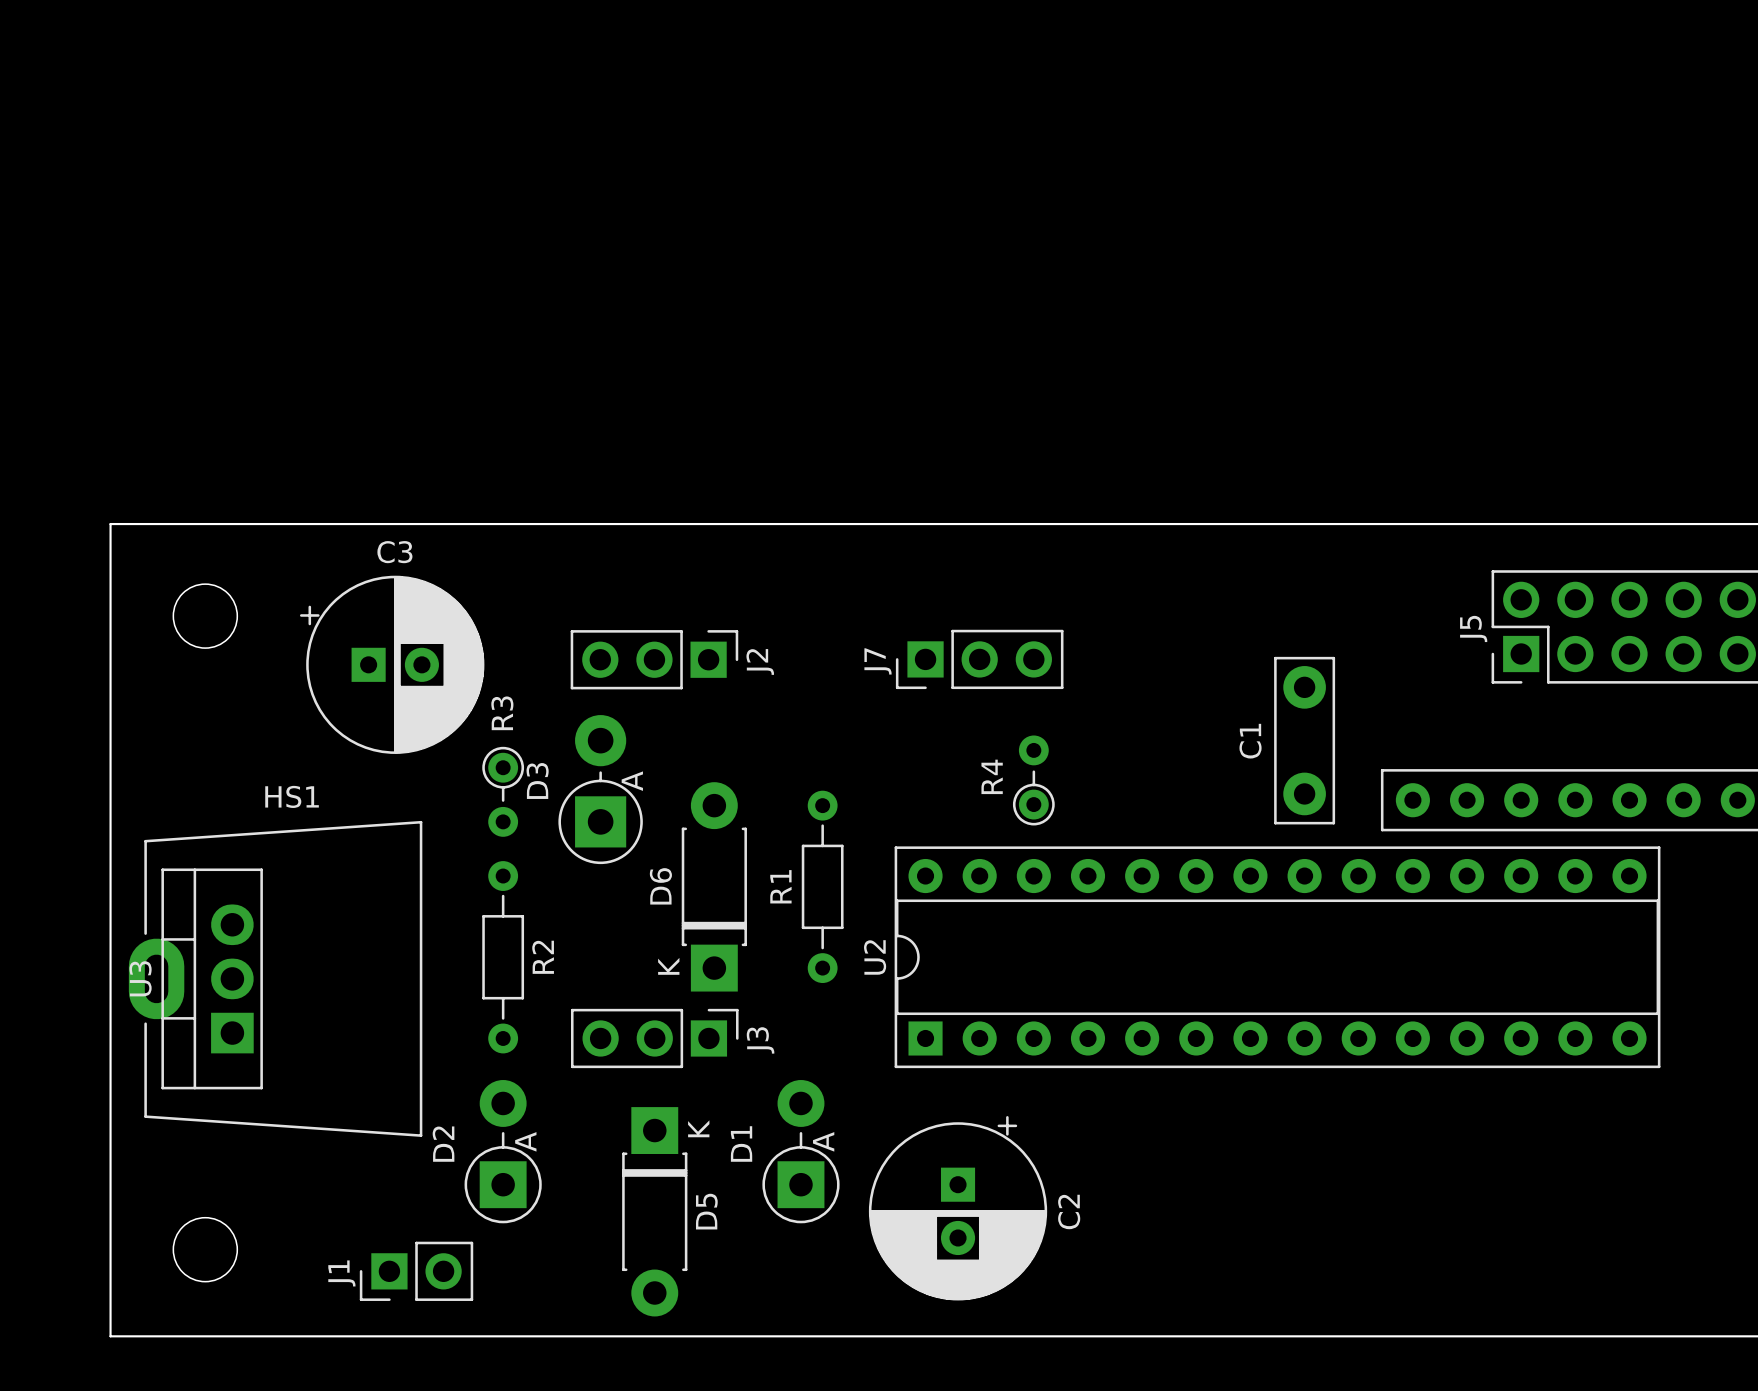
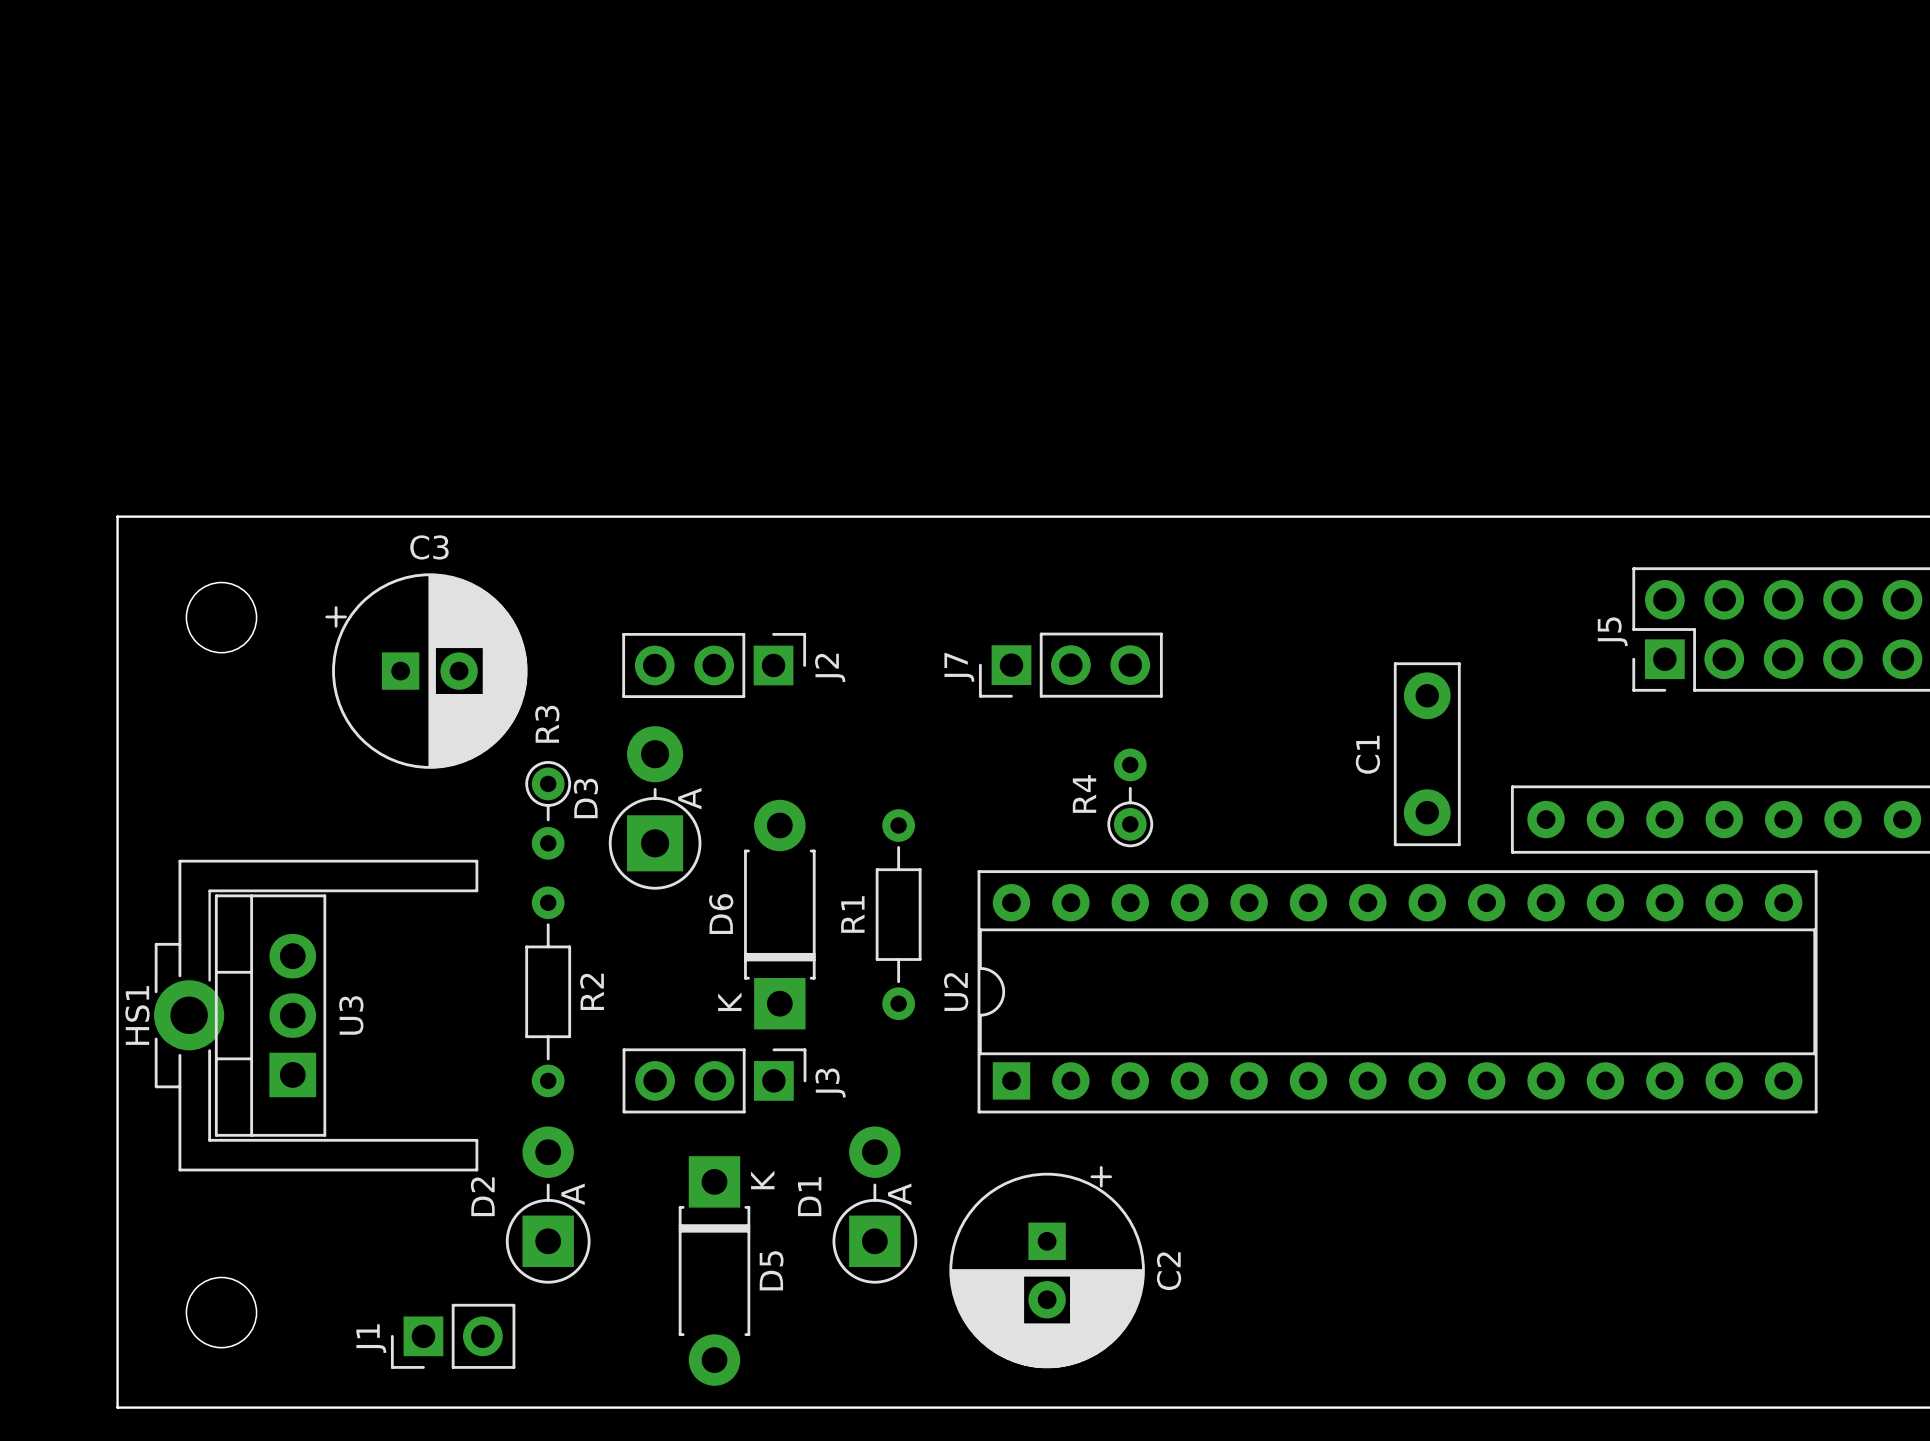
HS1 name position: HS1 (292, 796) -> HS1 (137, 1015)
HS1 footprint: [128, 820, 423, 1137] -> [154, 859, 479, 1172]
U3 name position: U3 (140, 978) -> U3 (351, 1015)
U3 position: (212, 978) -> (270, 1015)

